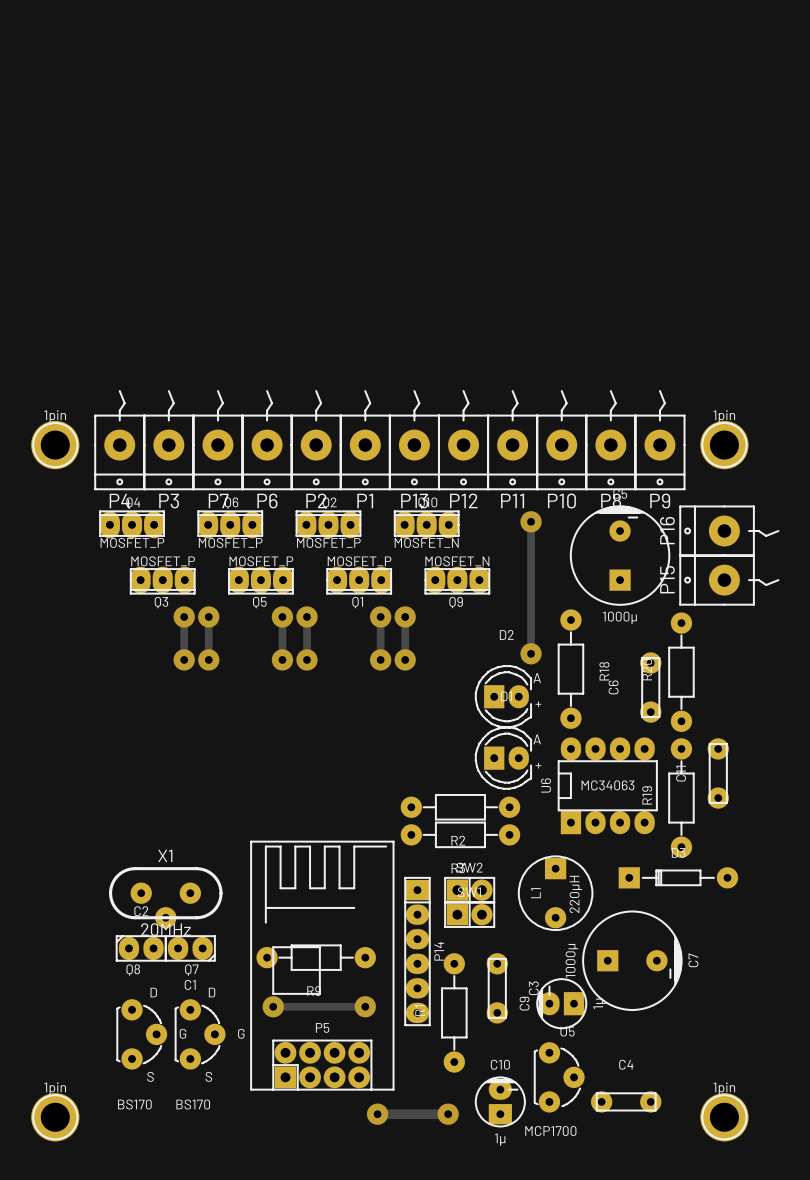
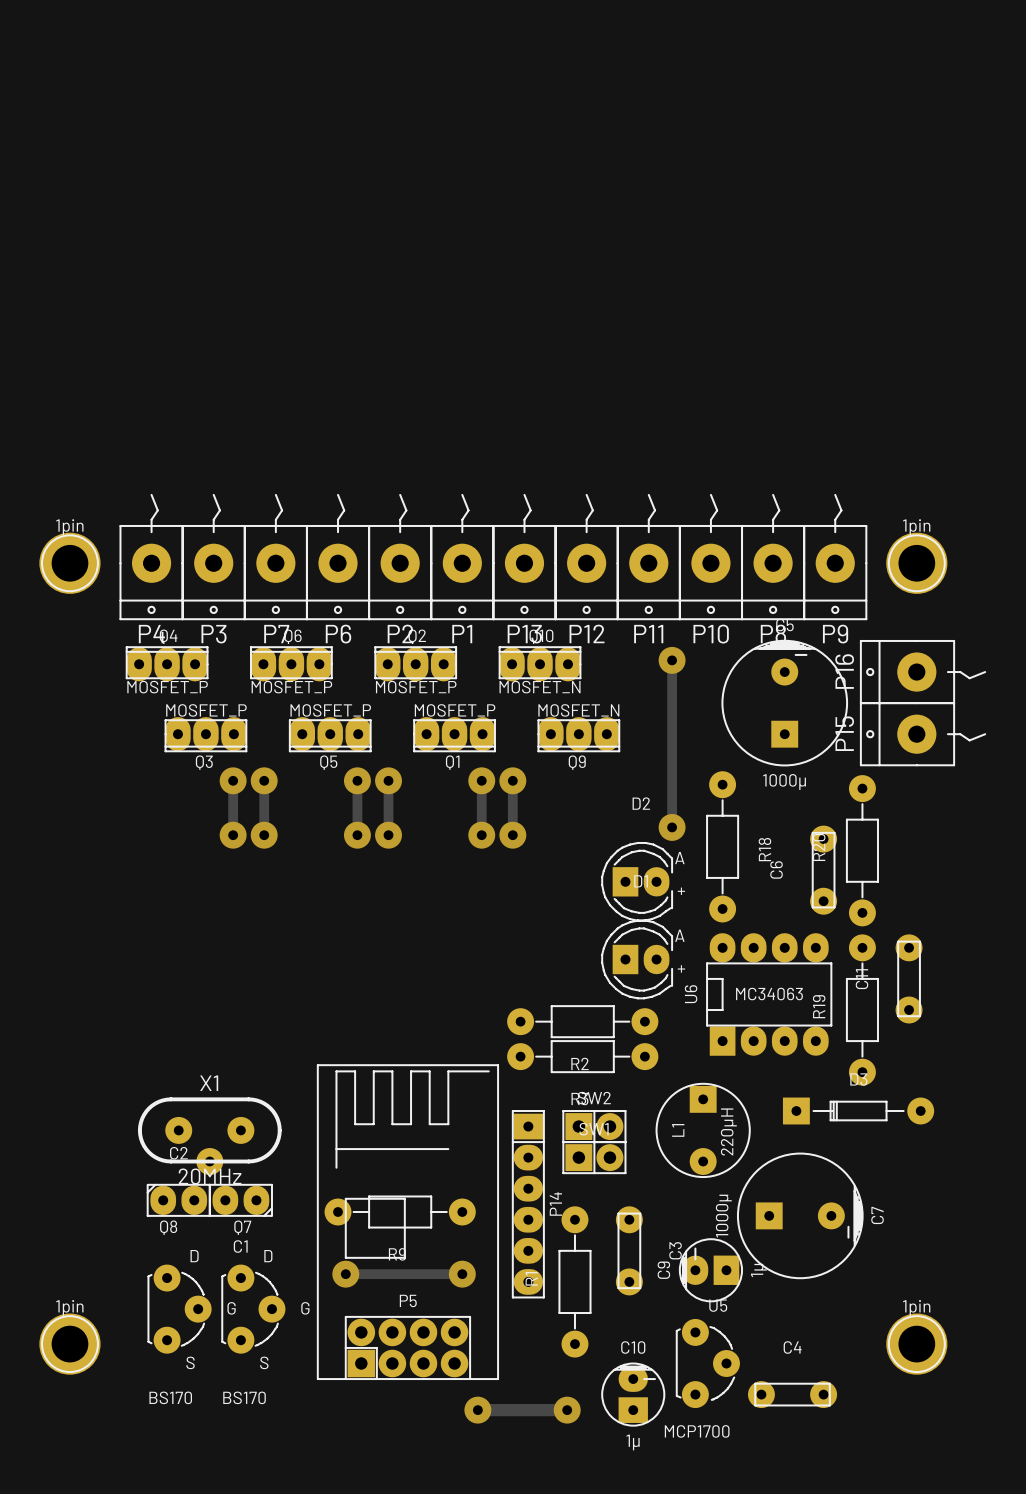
1pin position: (55, 1117) -> (69, 1344)
1pin position: (724, 1117) -> (916, 1344)

